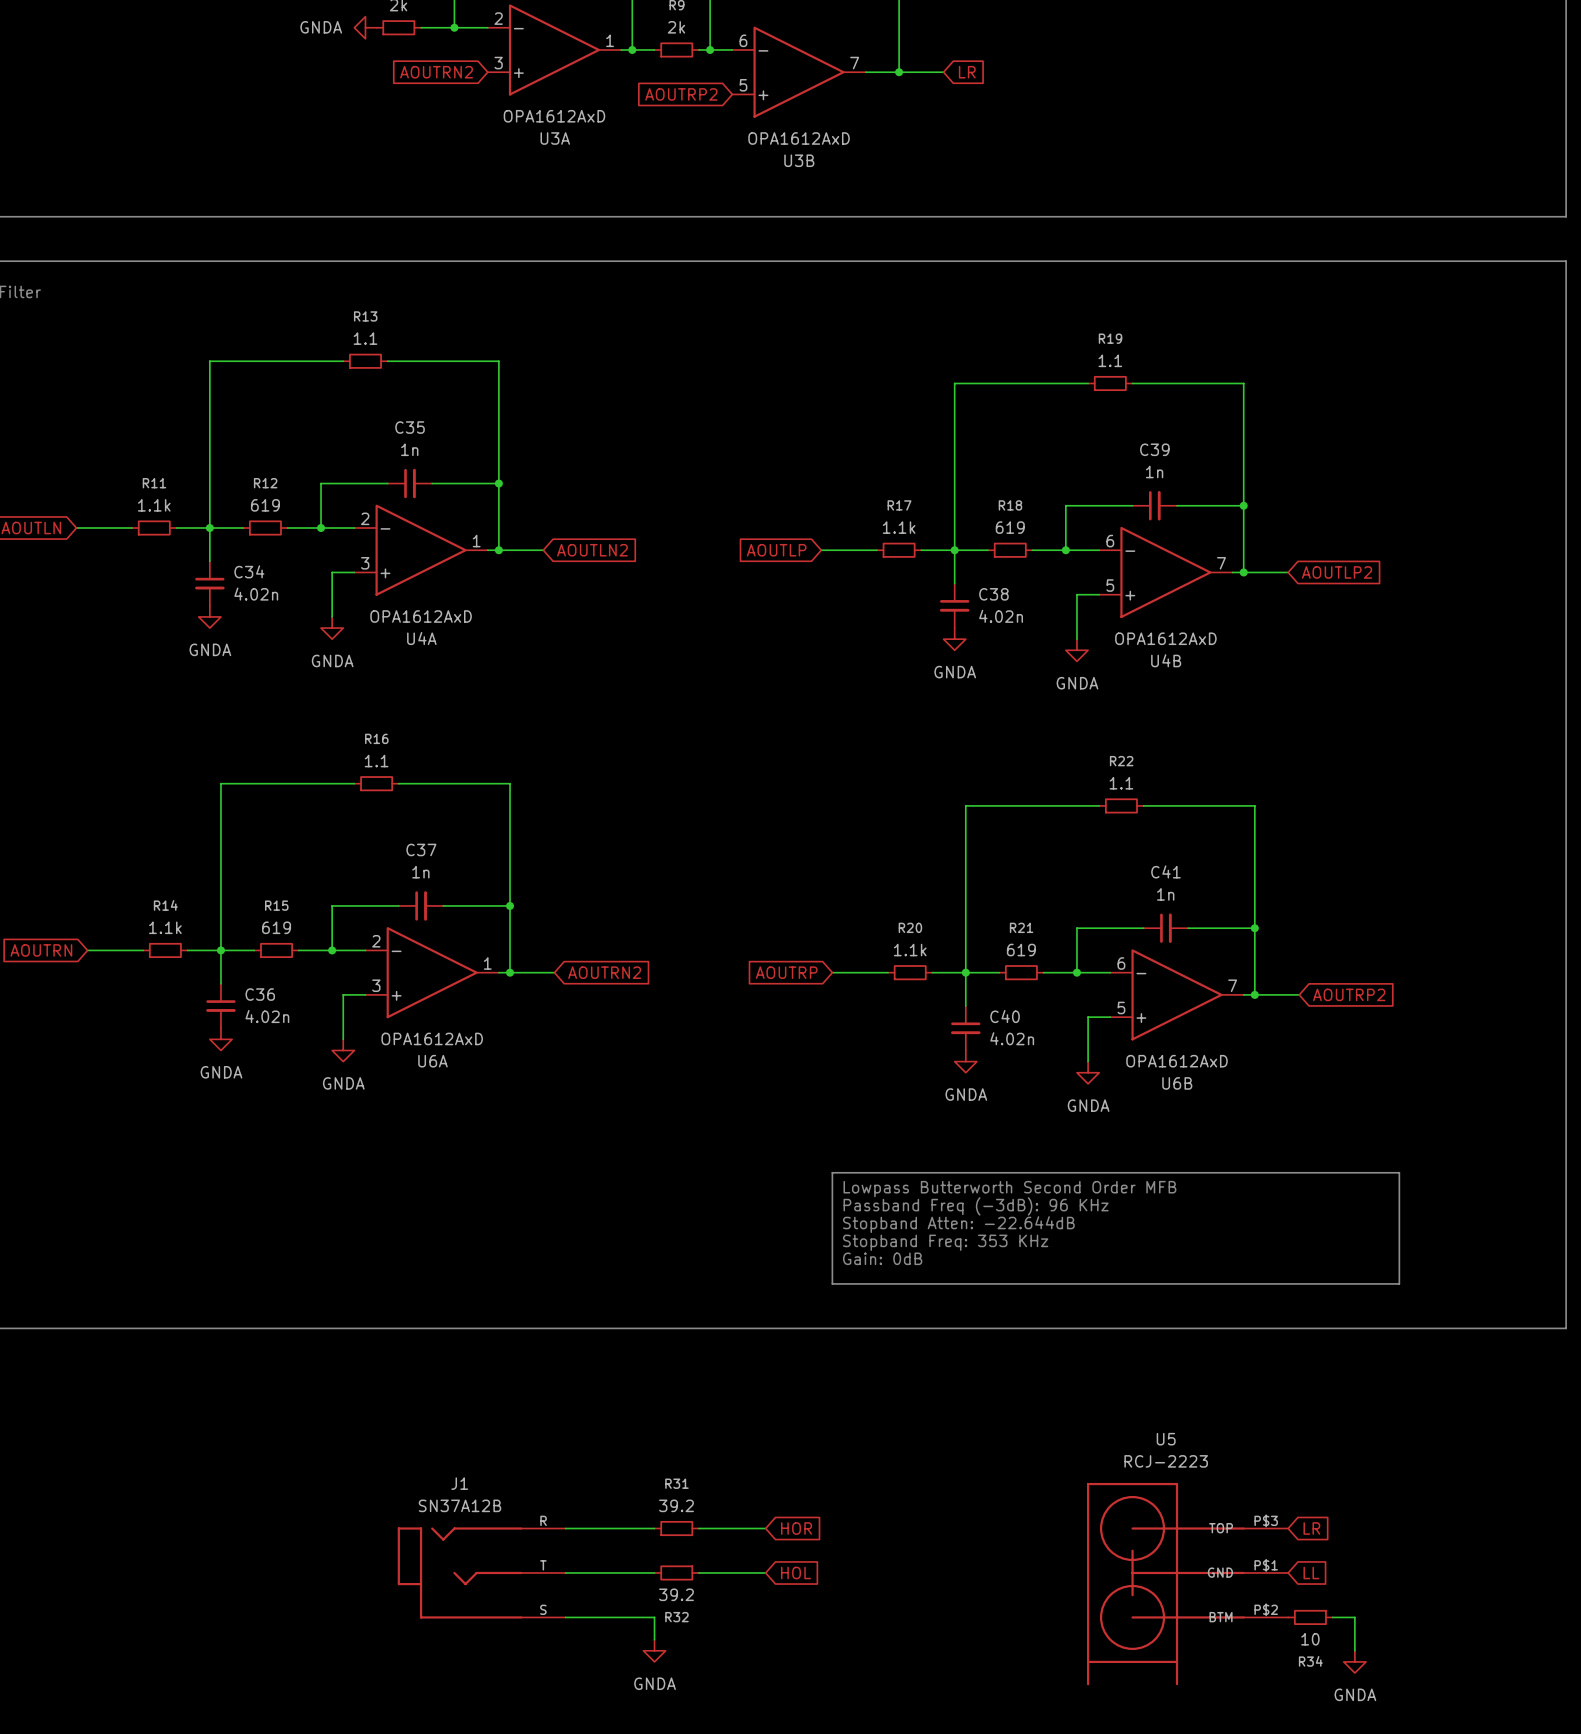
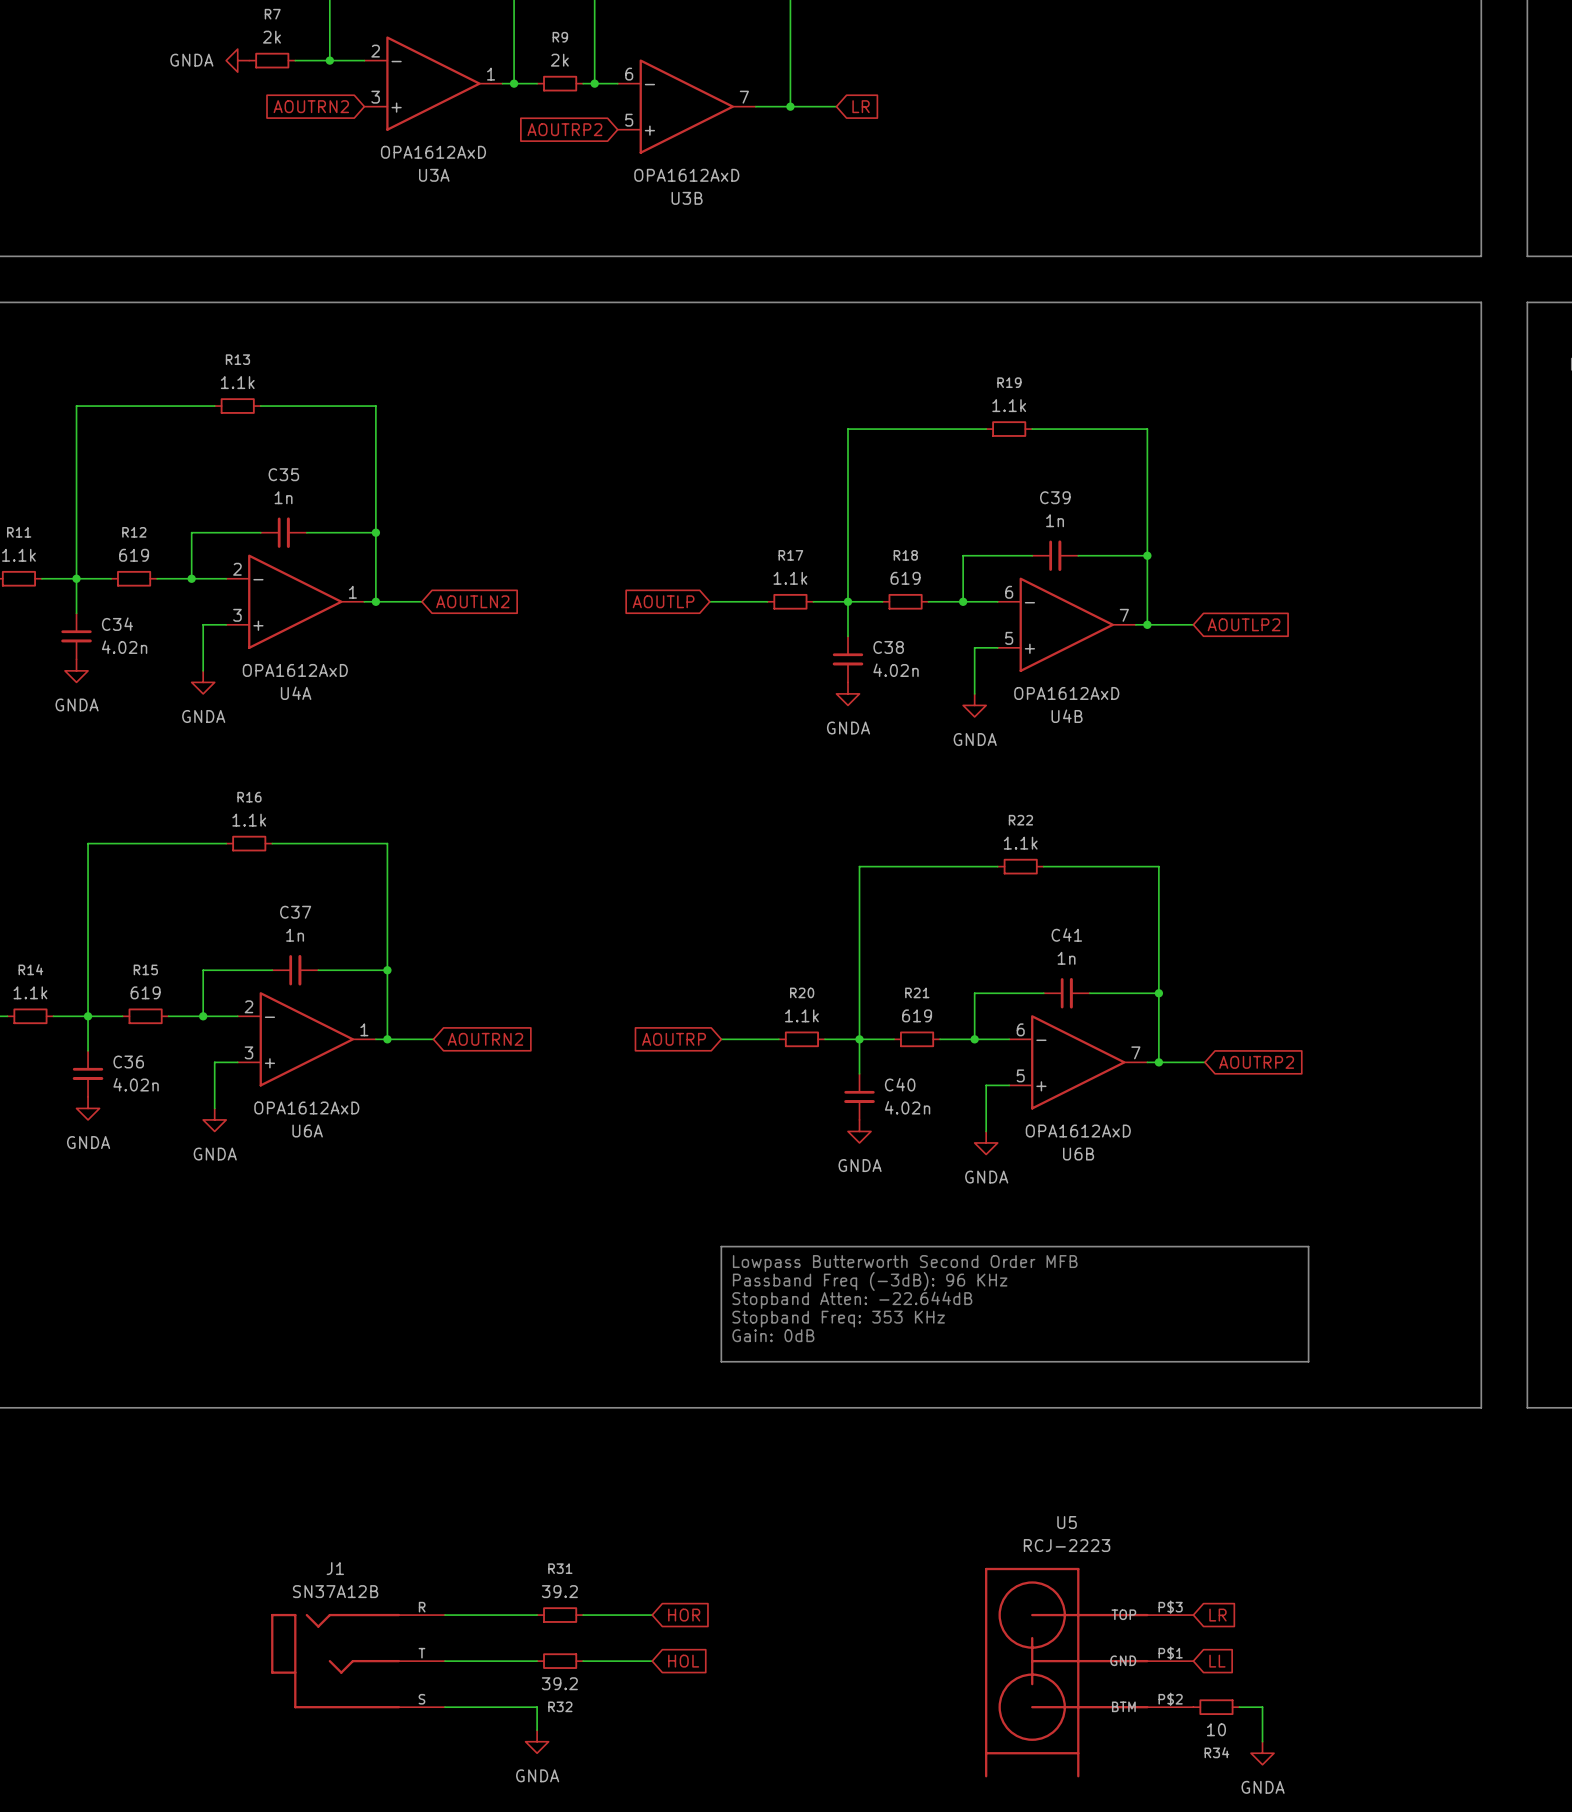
R13 value: 1.1 (365, 338) -> 1.1k (237, 382)
R19 value: 1.1 (1110, 360) -> 1.1k (1009, 405)
R16 value: 1.1 (376, 761) -> 1.1k (249, 820)
R22 value: 1.1 (1121, 783) -> 1.1k (1020, 843)

